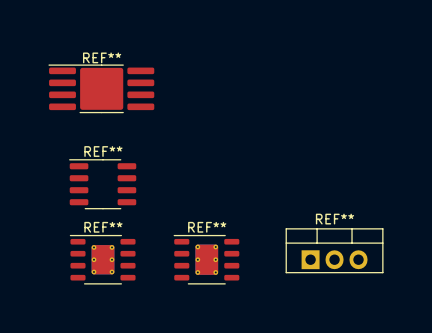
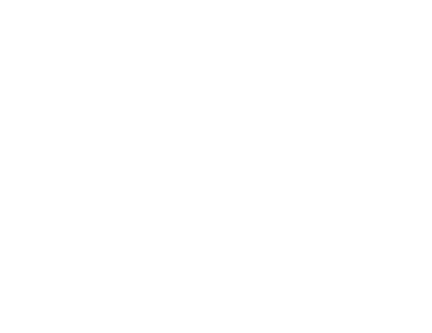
REF**: (101, 88) -> none
REF**: (102, 184) -> none
REF**: (334, 250) -> none
REF**: (102, 259) -> none
REF**: (206, 259) -> none

